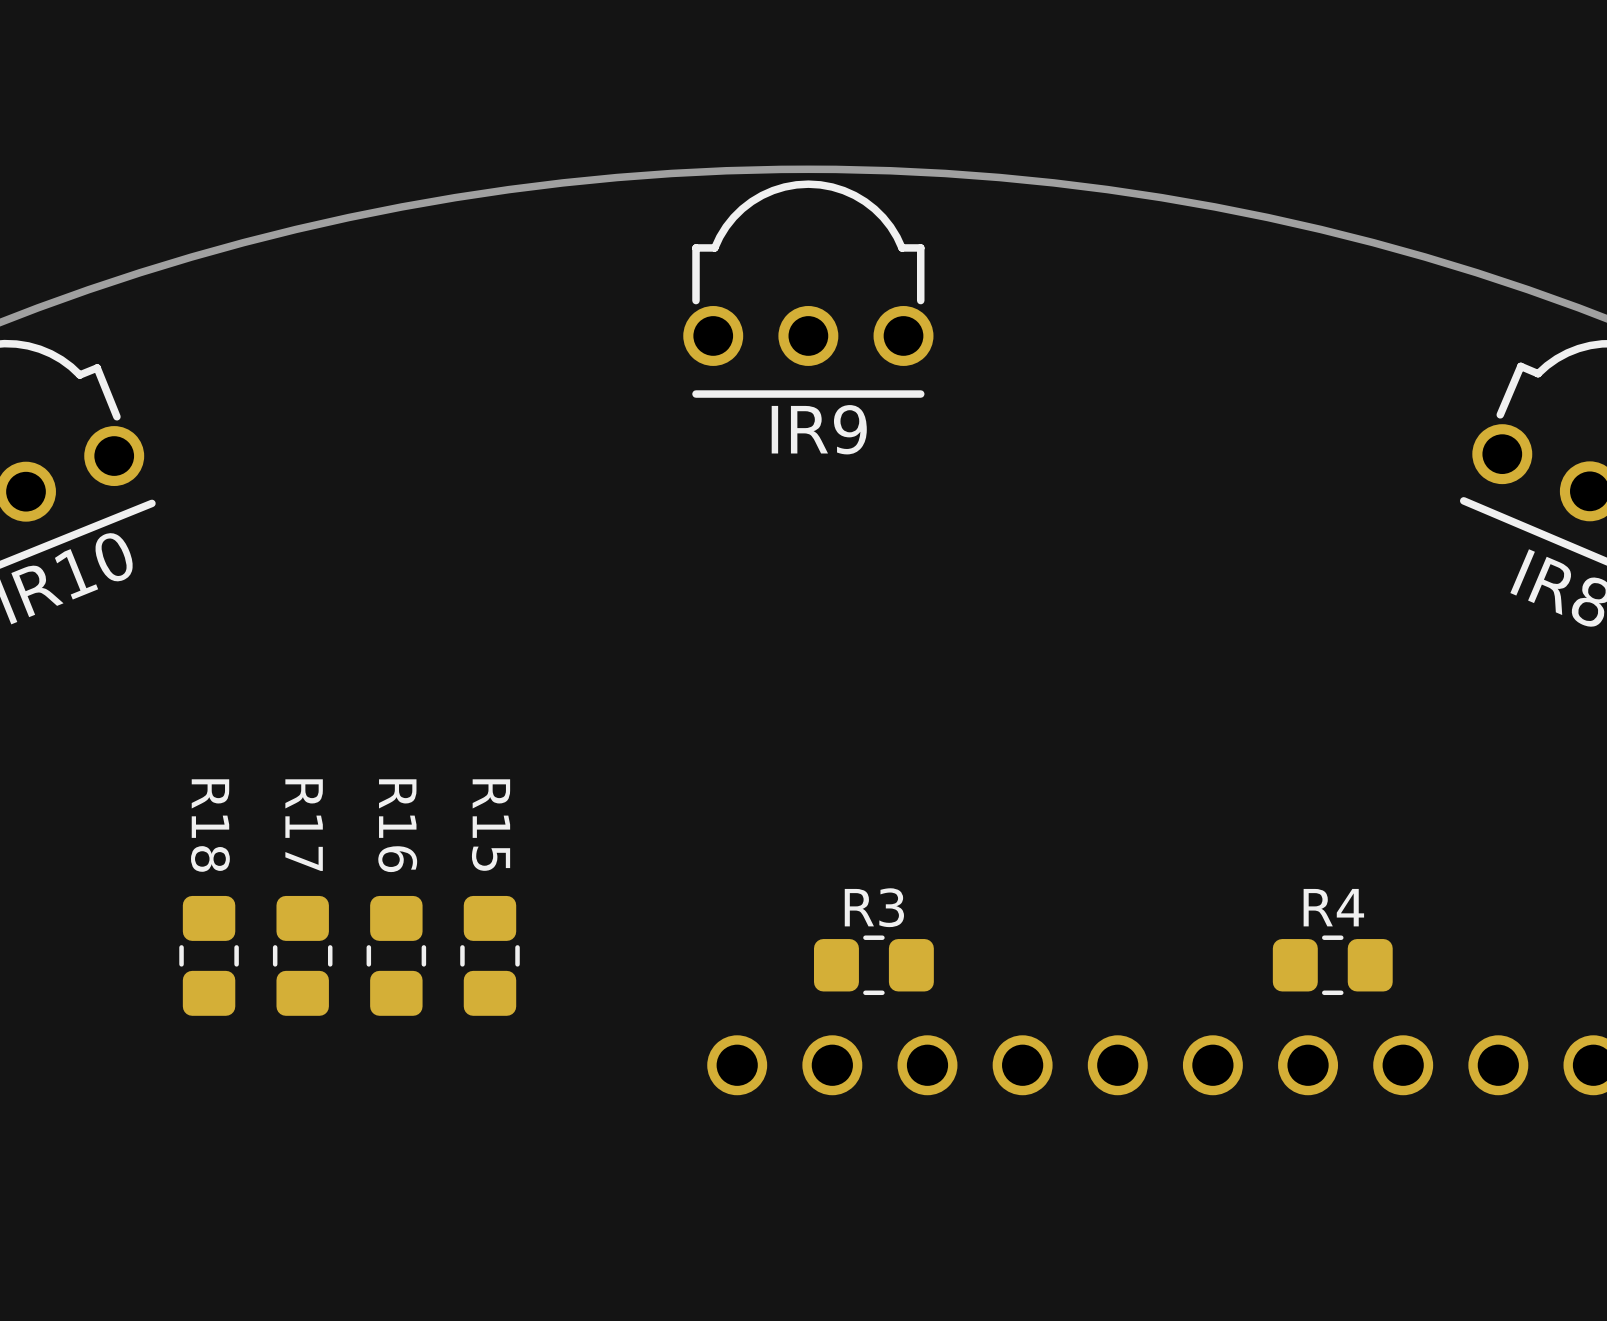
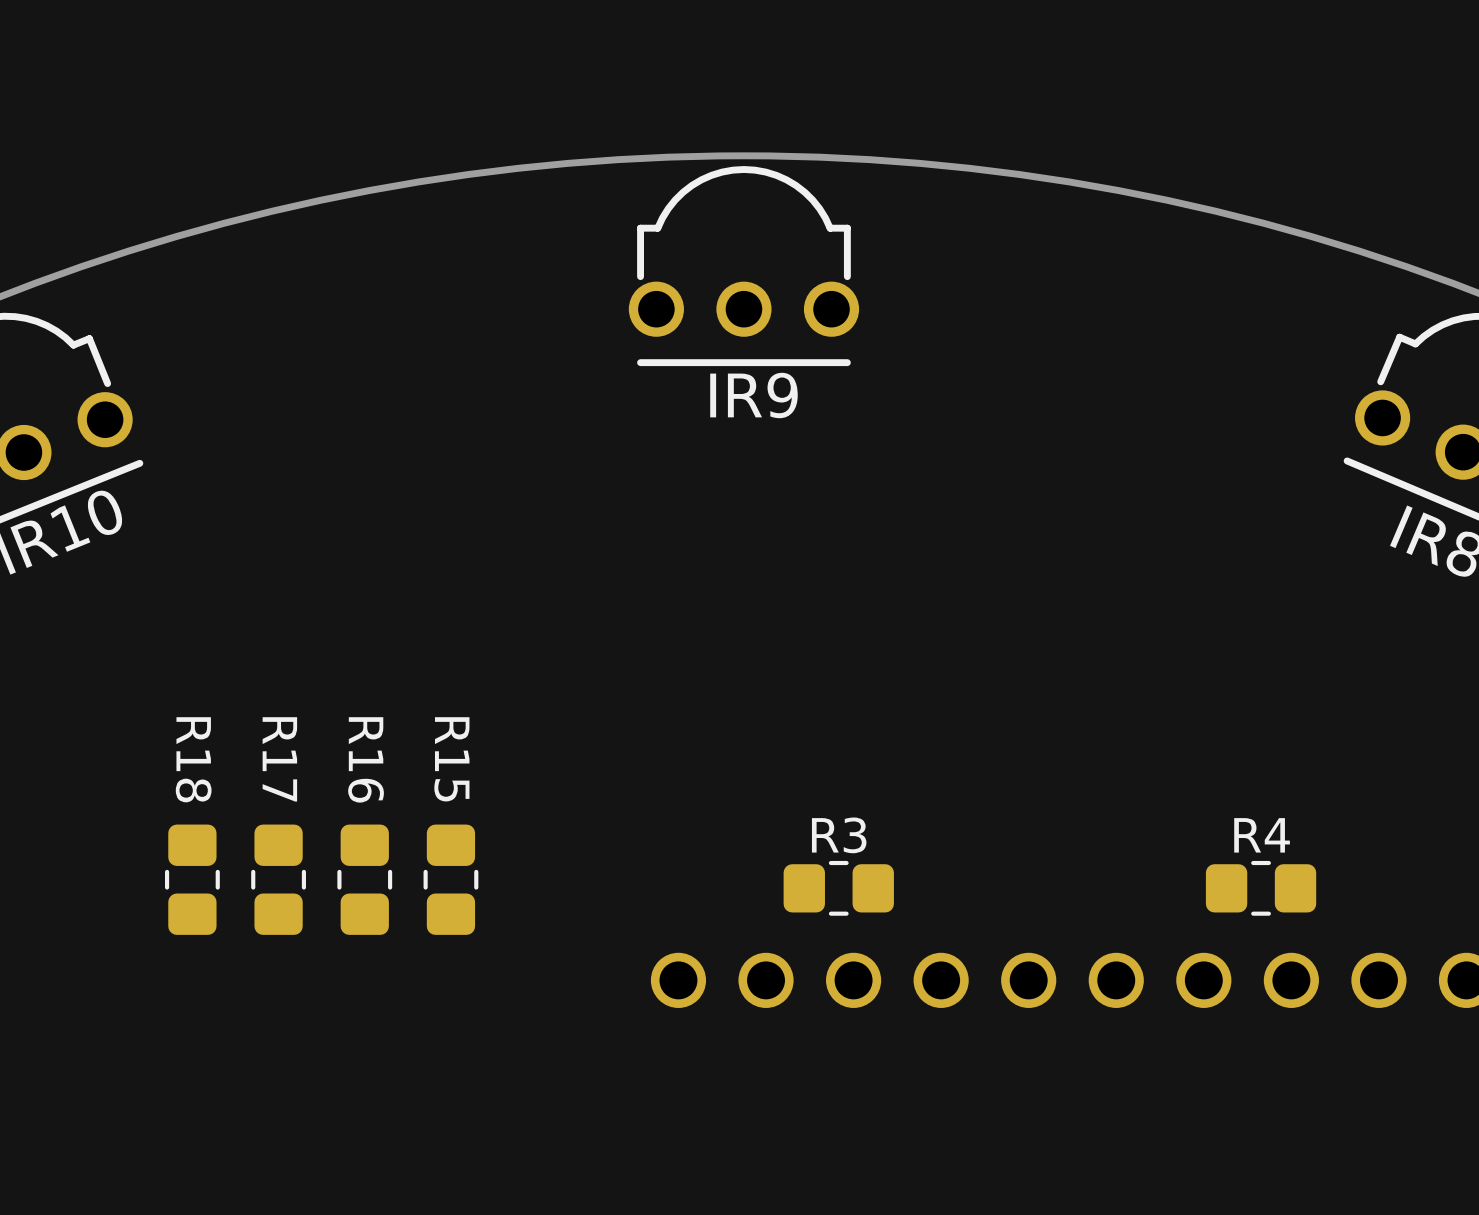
R3 position: (873, 965) -> (838, 888)
R4 position: (1332, 965) -> (1261, 888)

